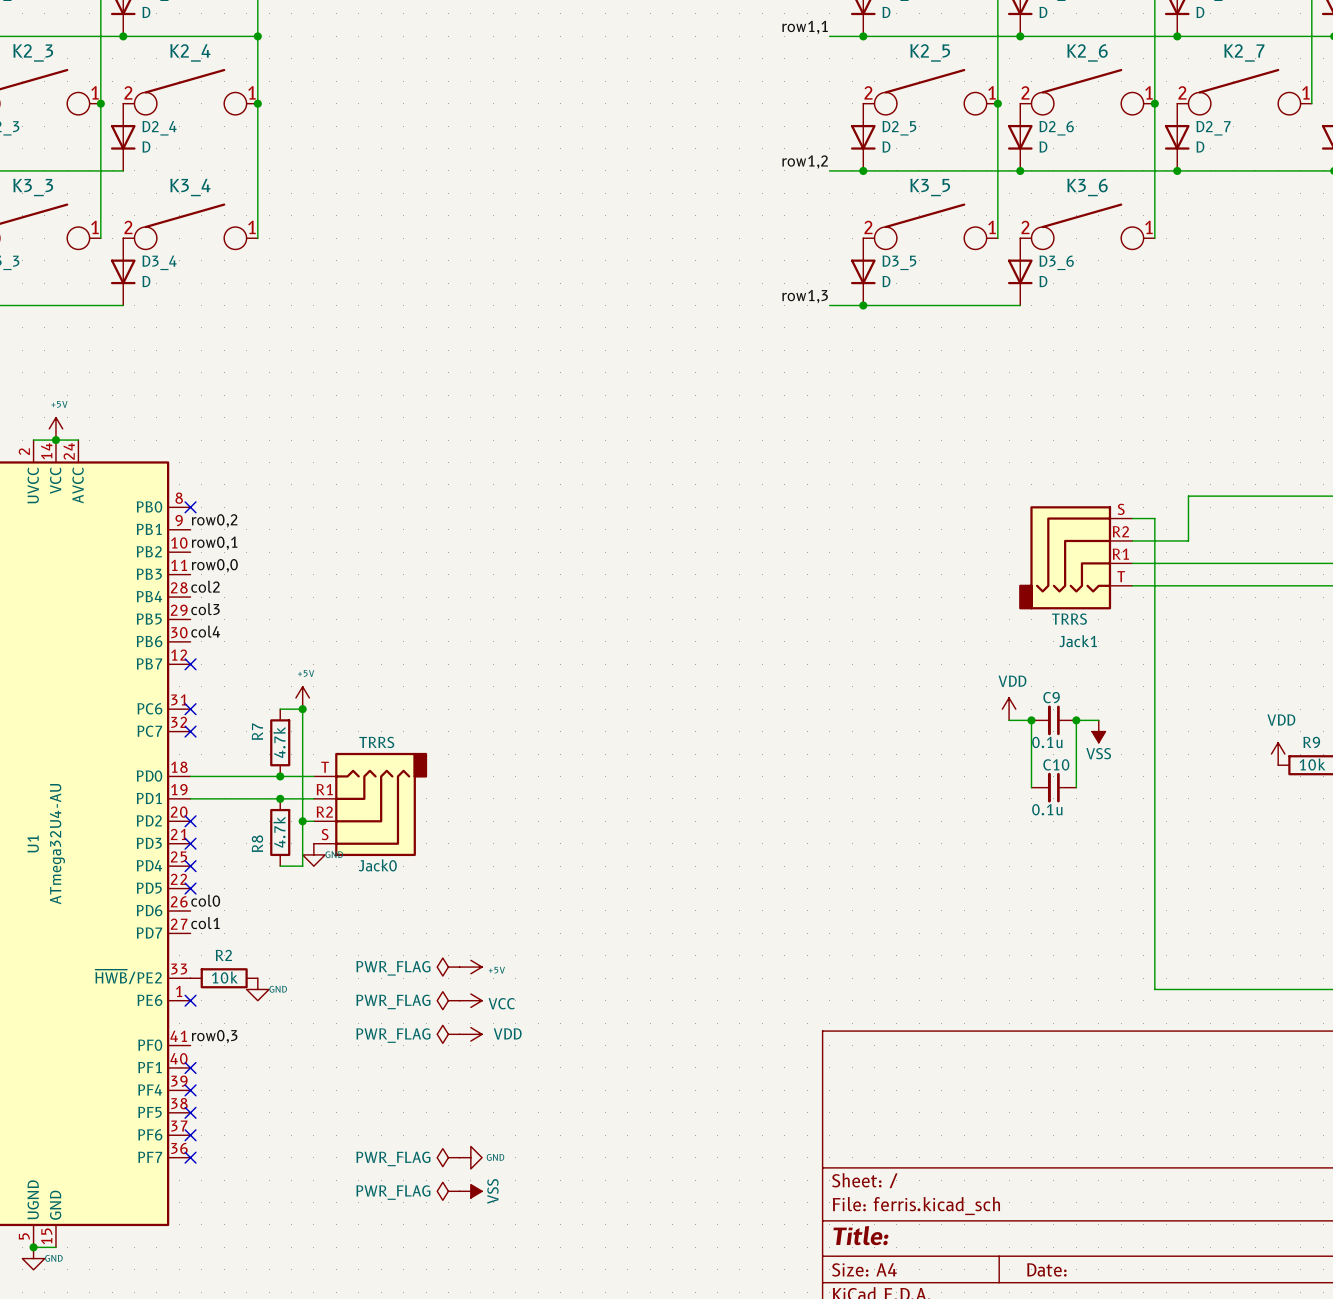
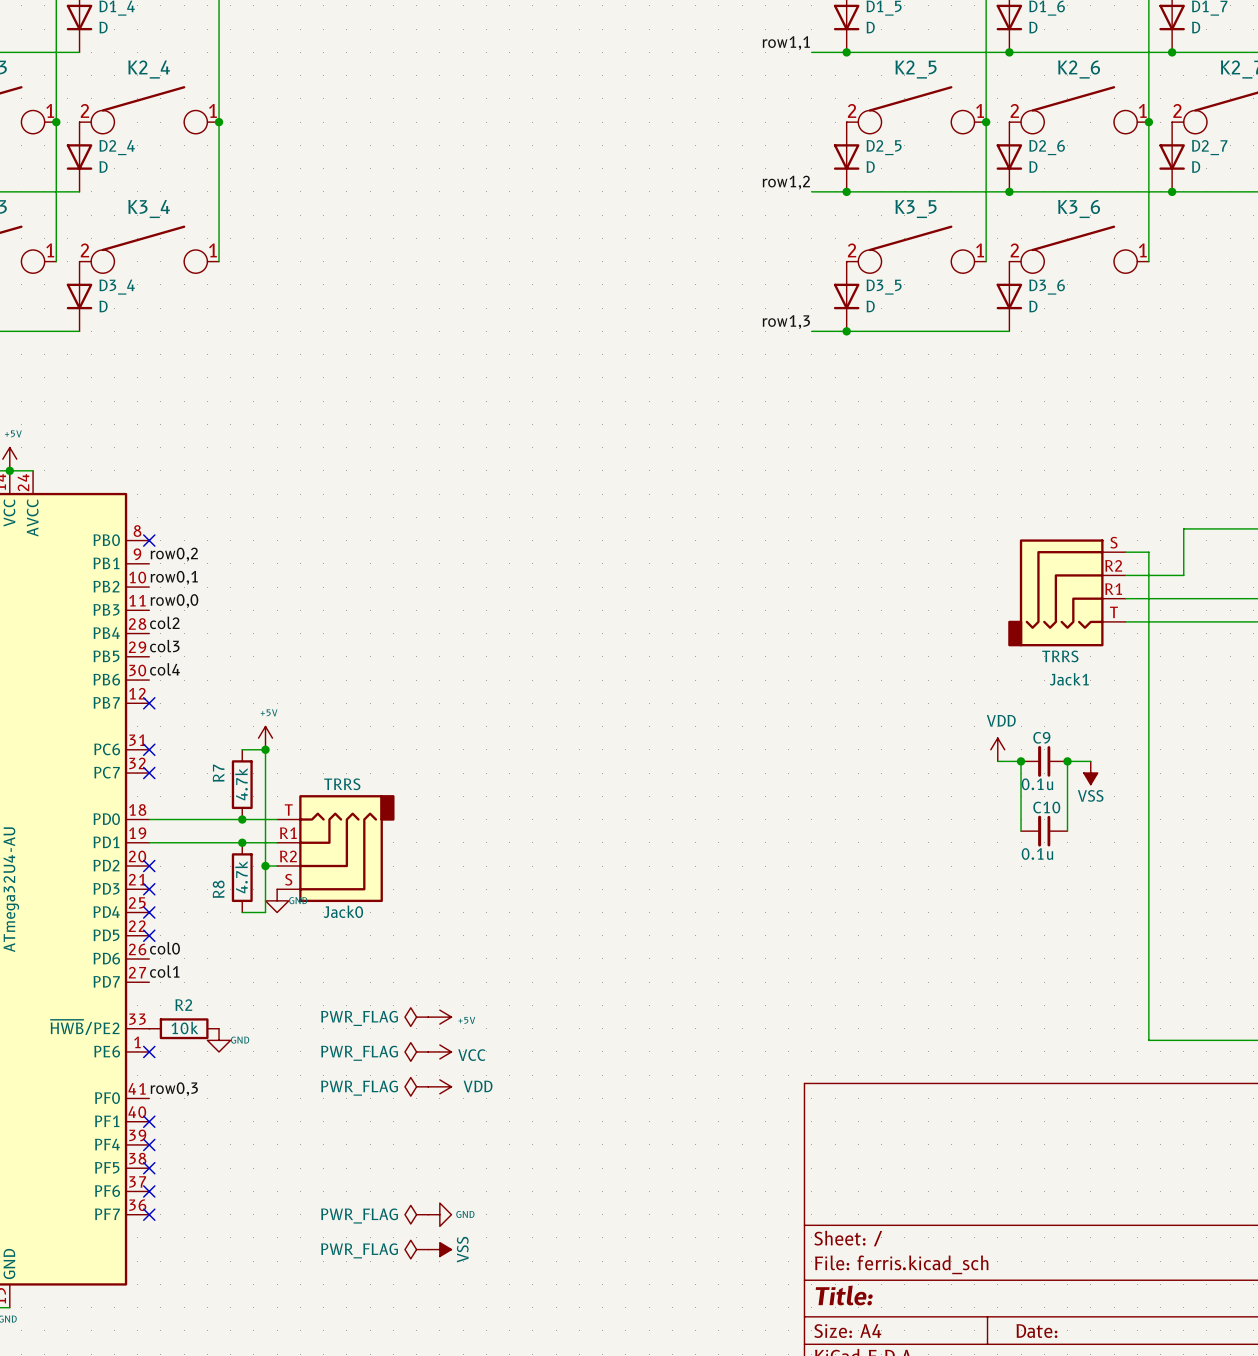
wire: (123, 36) (257, 36) -> none
junction: (123, 36) -> none
junction: (257, 36) -> none

